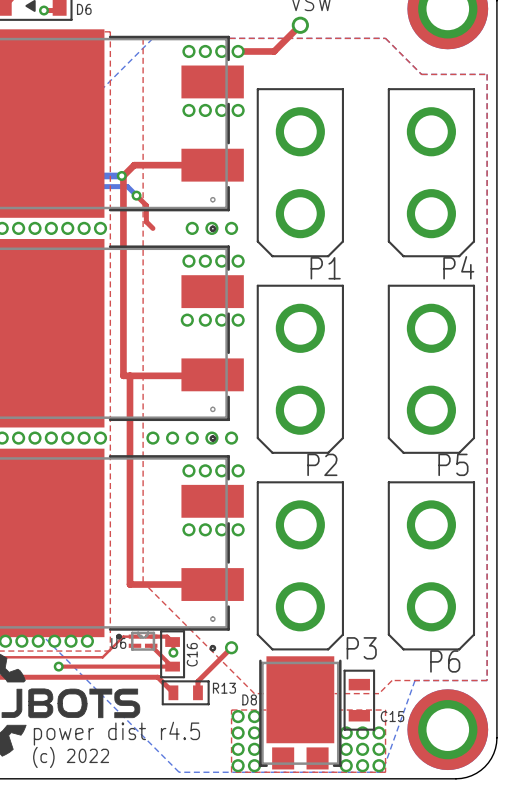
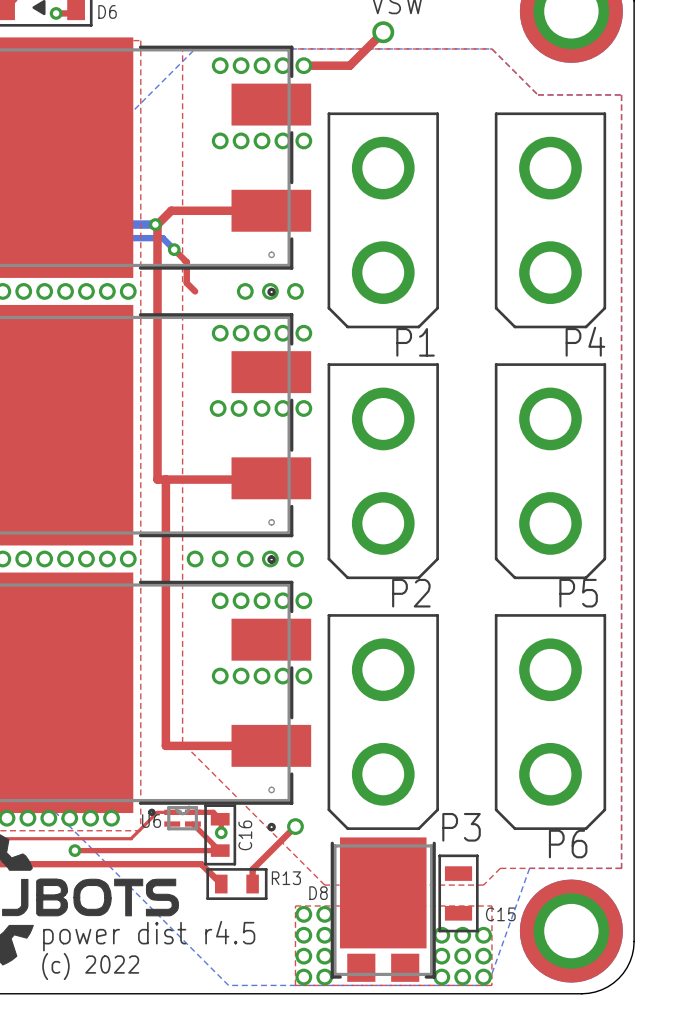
via: none -> (220, 65)
via: none -> (220, 140)
via: none -> (220, 333)
via: none -> (218, 408)
via: none -> (220, 600)
via: none -> (220, 676)

